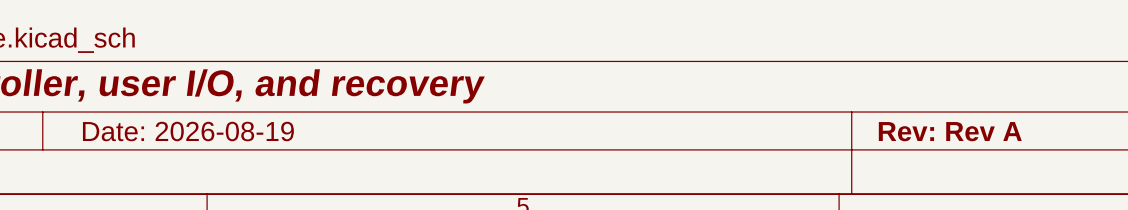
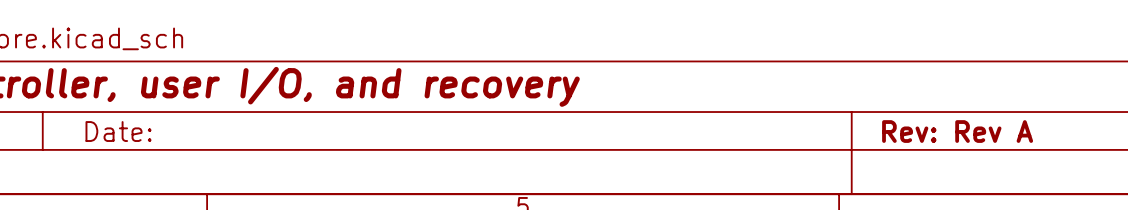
title block: Date: 2026-08-19 (188, 131) -> Date: (118, 131)

